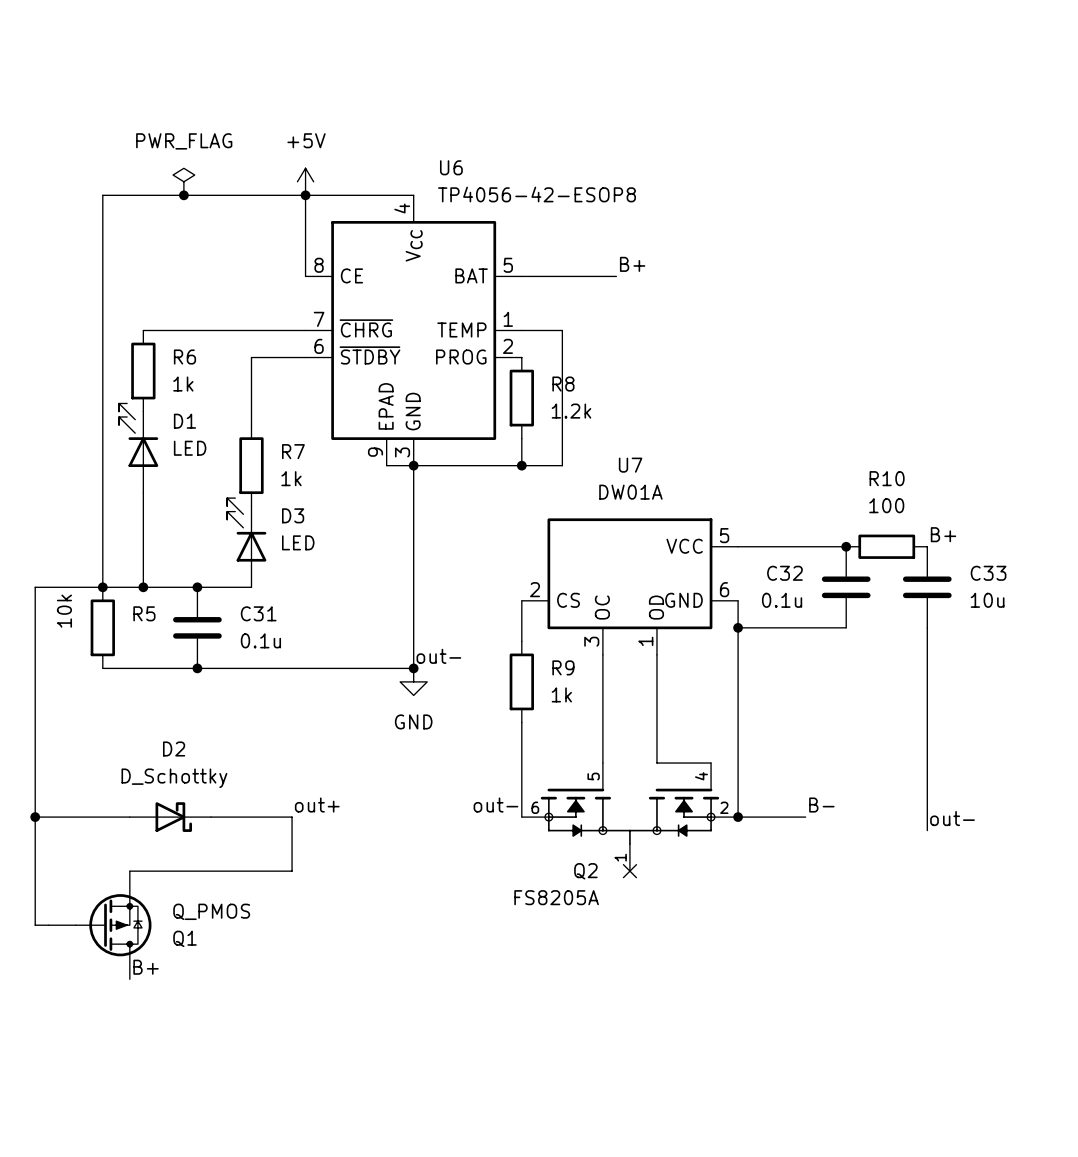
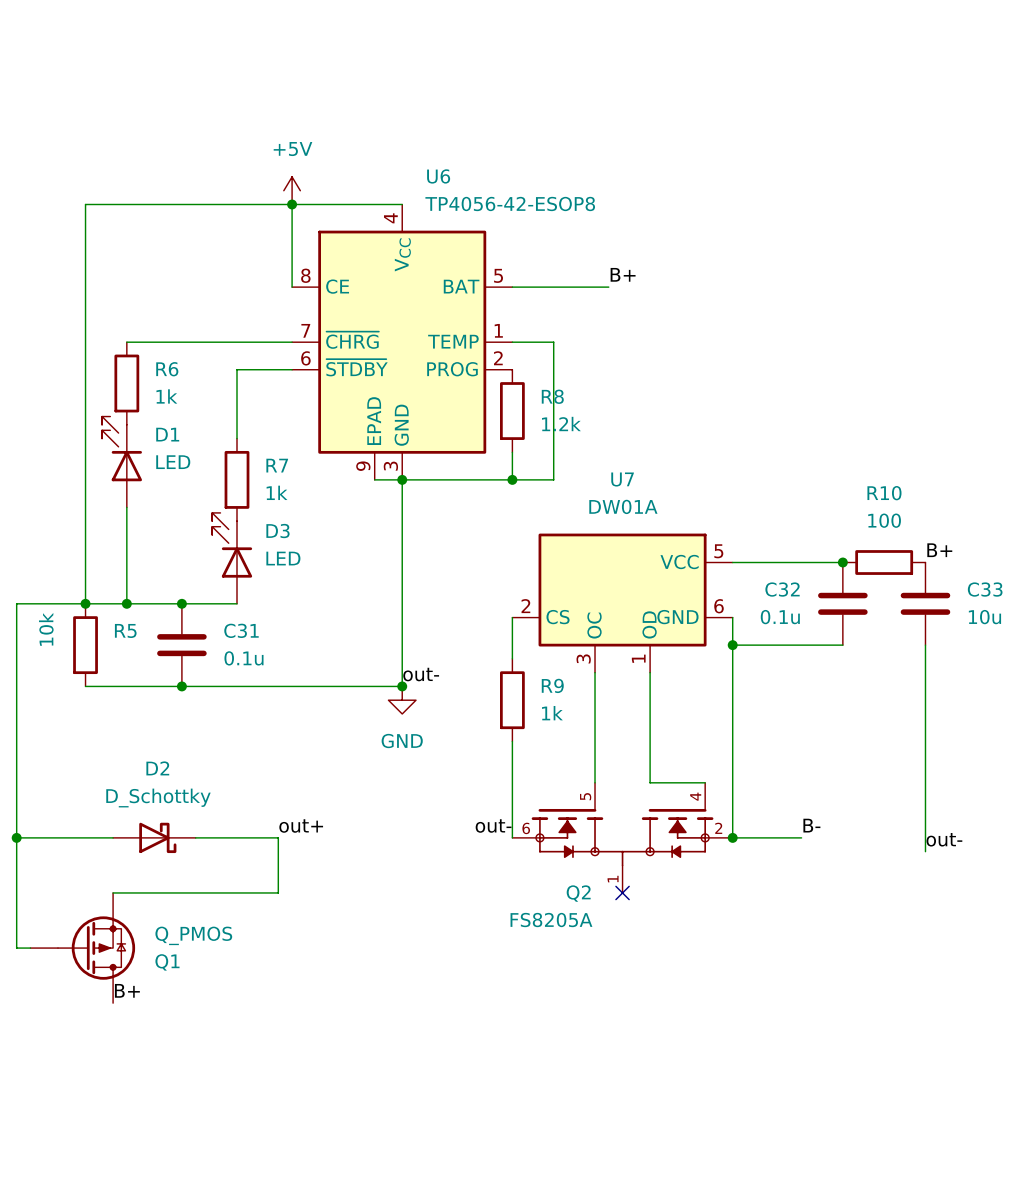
power symbol: PWR_FLAG (183, 181) -> none
junction: (183, 195) -> none

